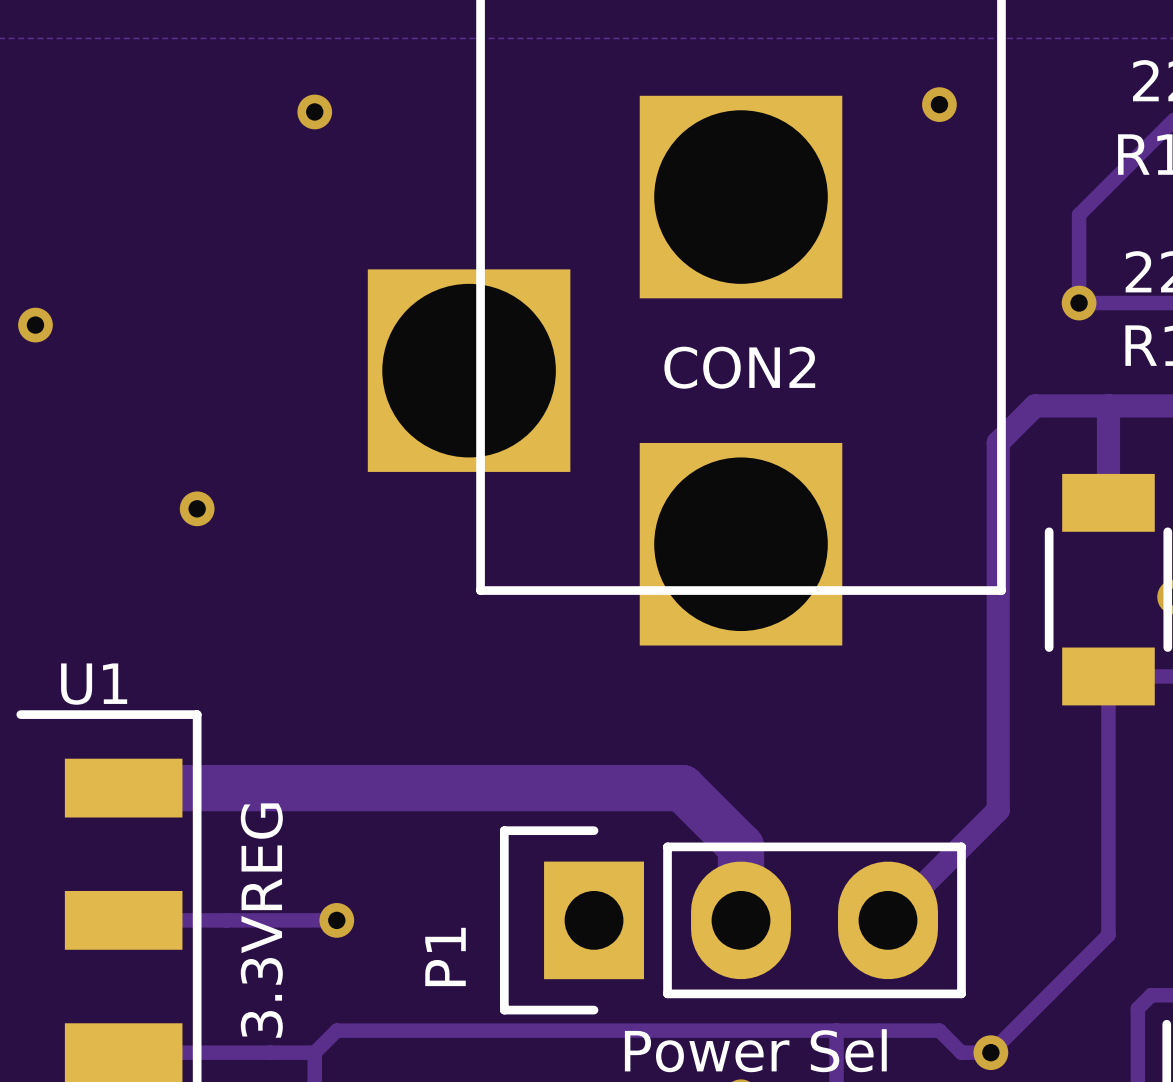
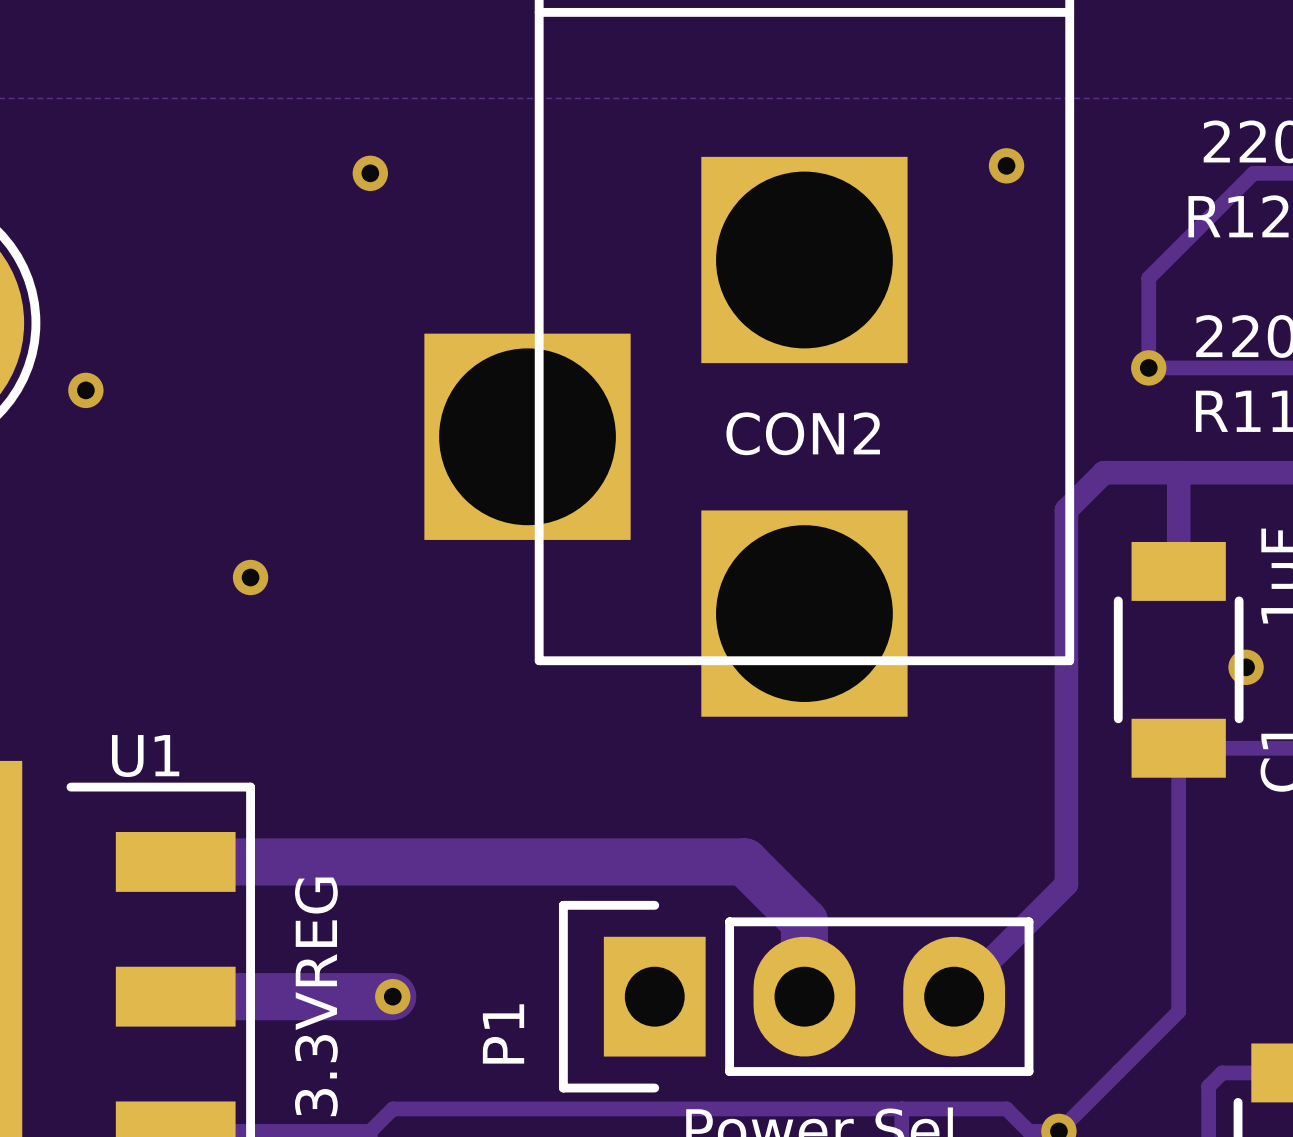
track width: thin (123, 920) (336, 920) -> thick (175, 996) (392, 996)

